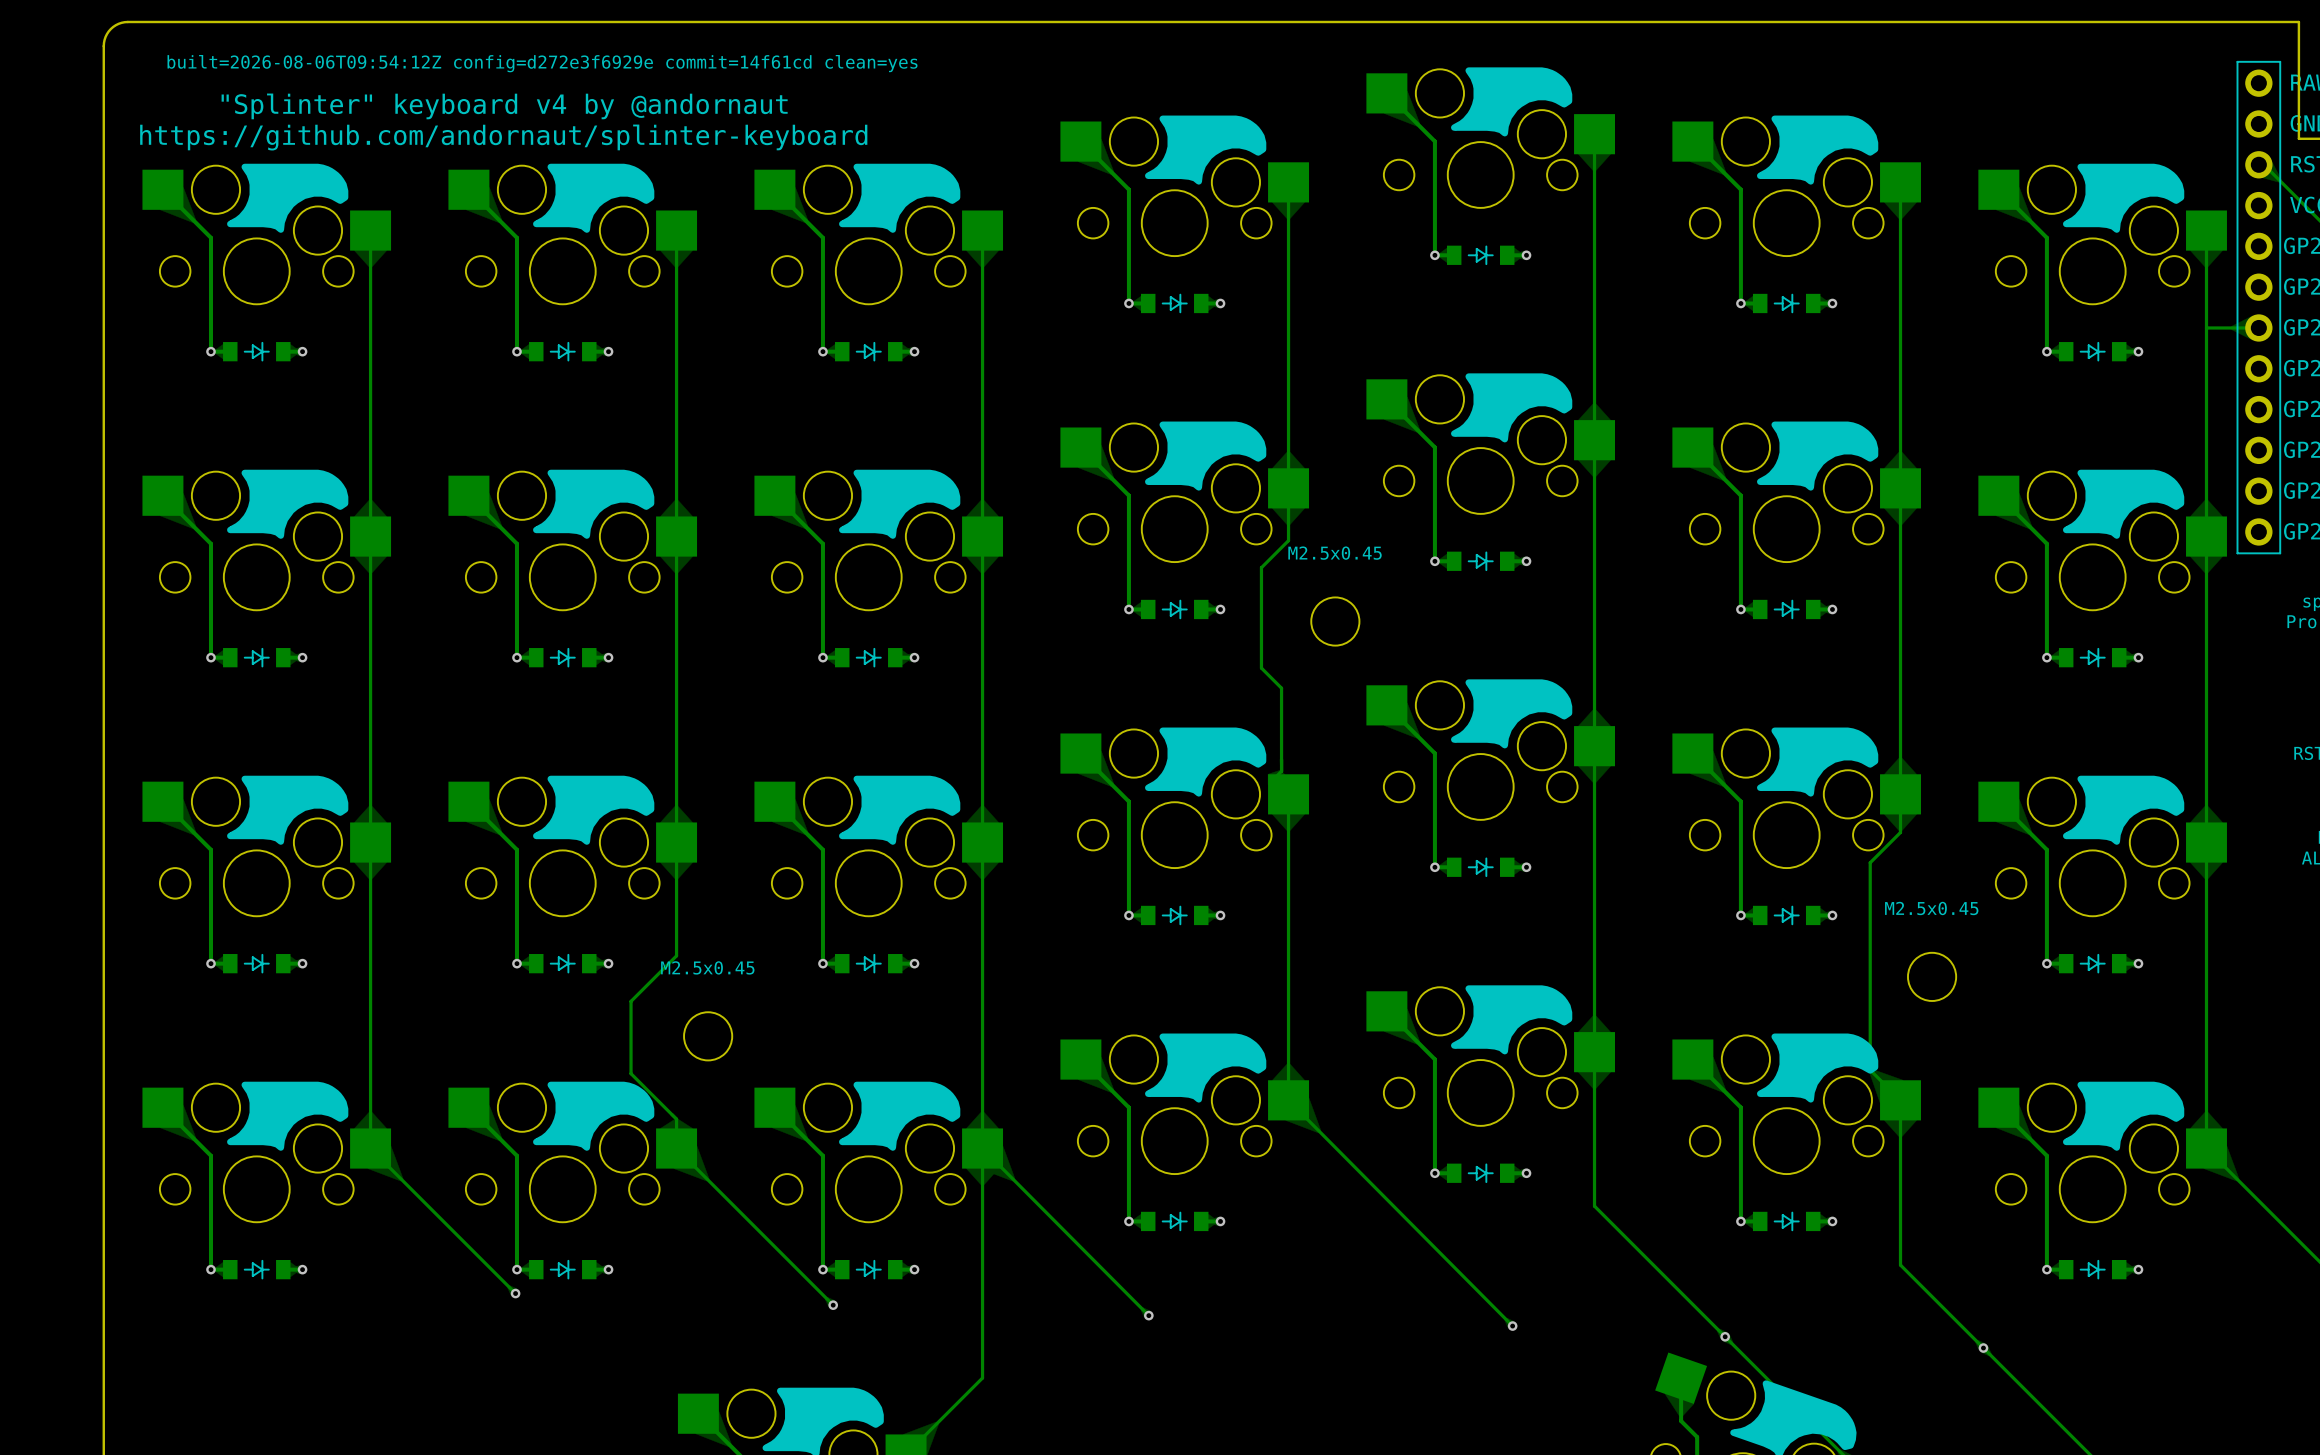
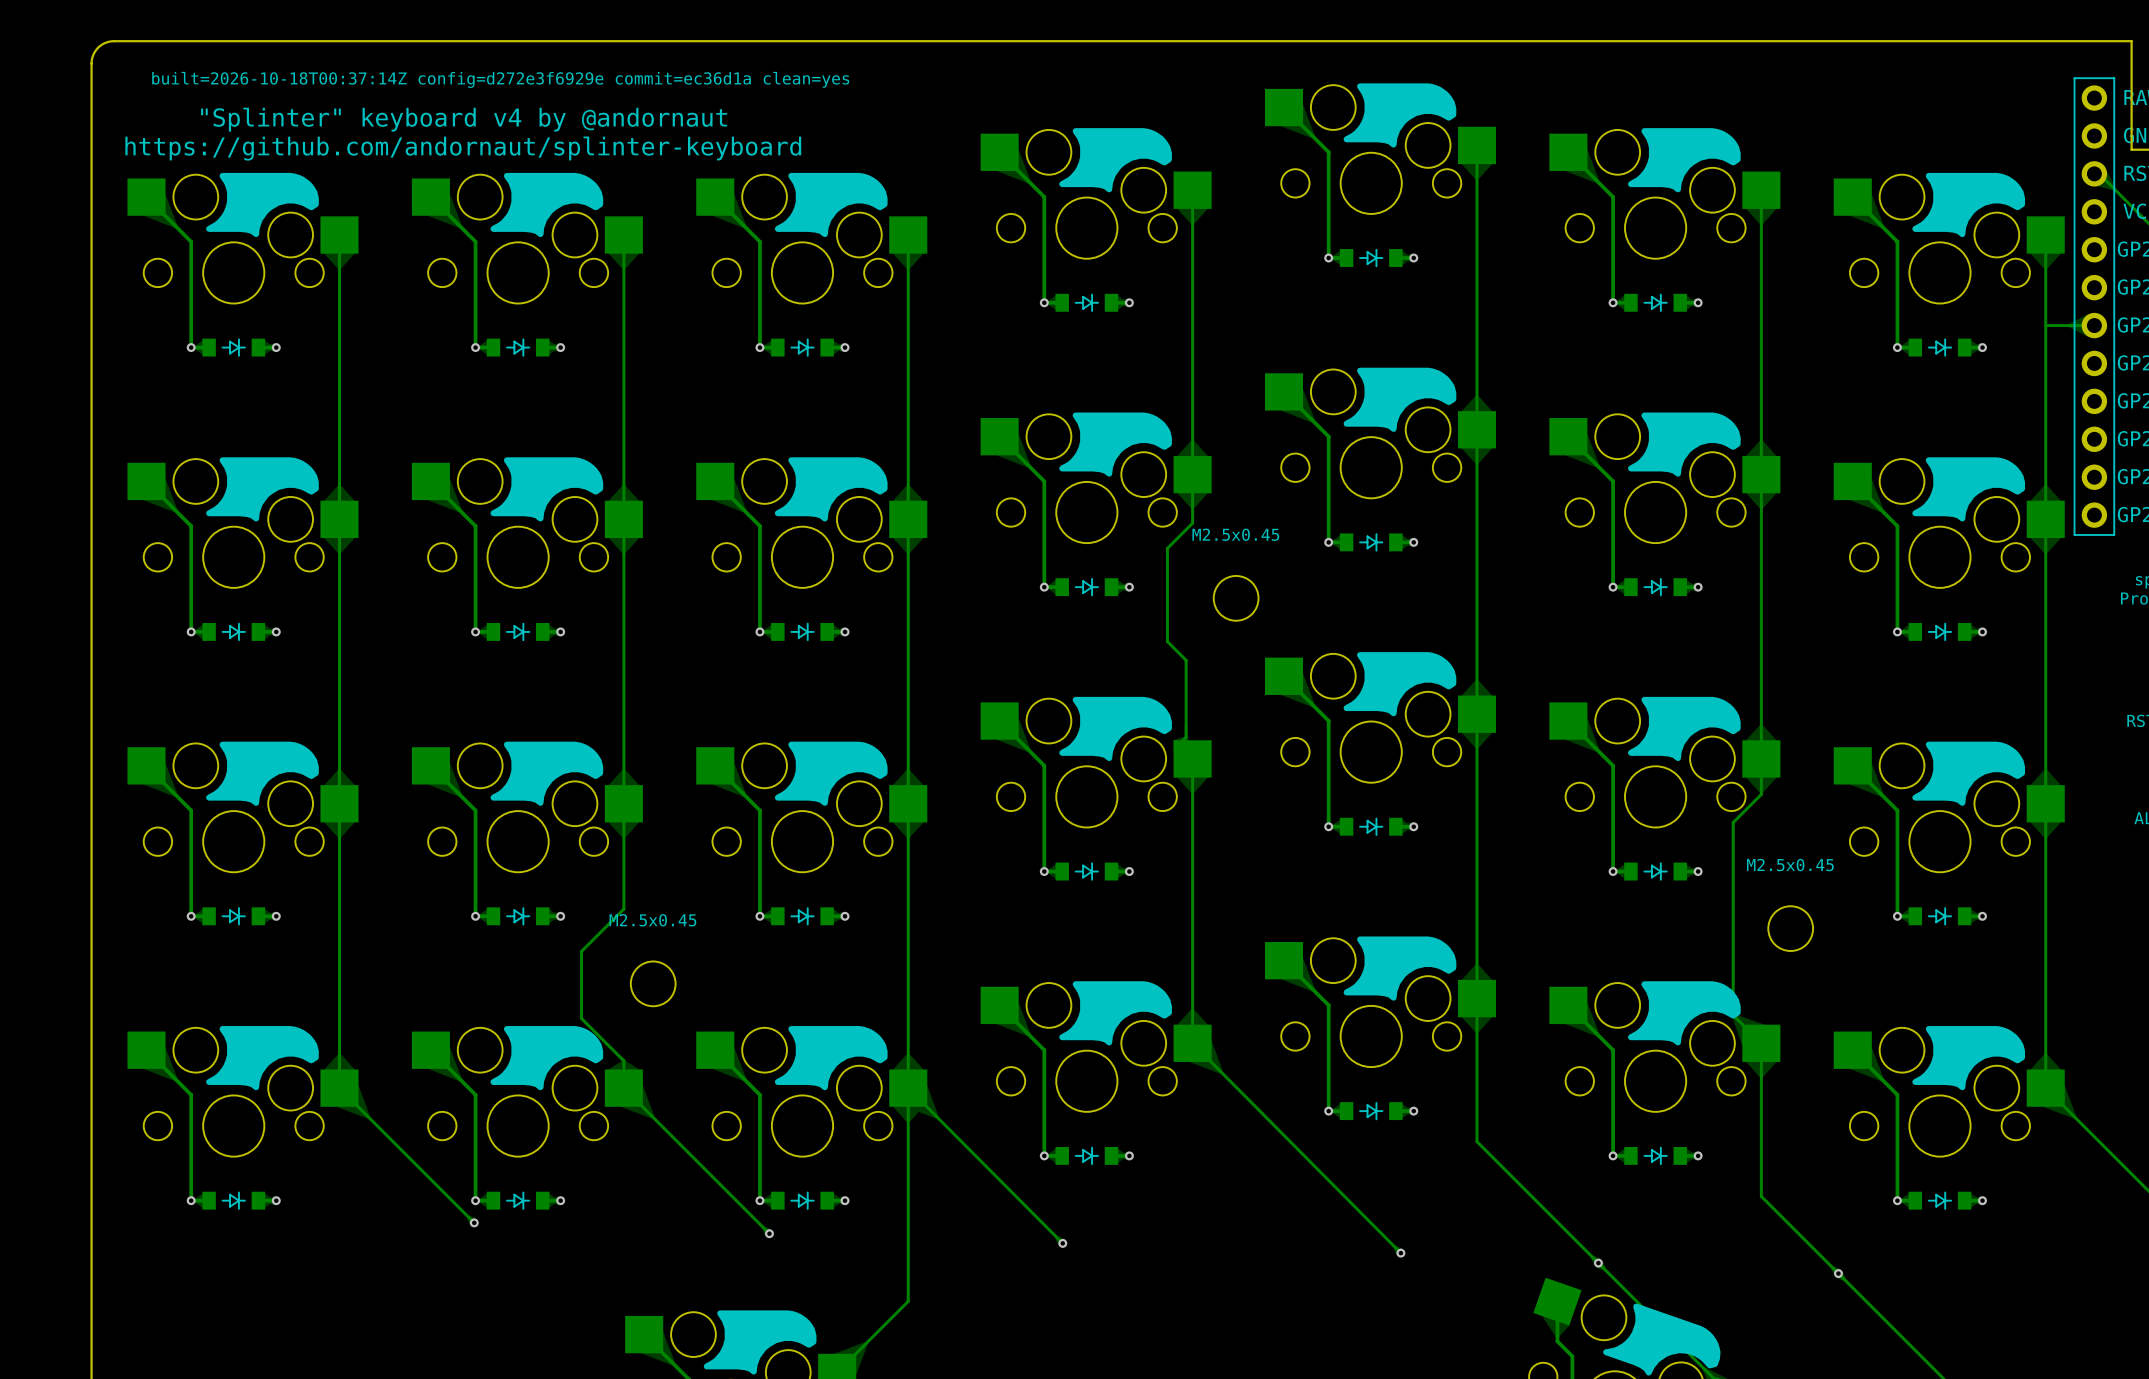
text: built=2026-08-06T09:54:12Z config=d272e3f6929e commit=14f61cd clean=yes (542, 63) -> built=2026-10-18T00:37:14Z config=d272e3f6929e commit=ec36d1a clean=yes (500, 79)

